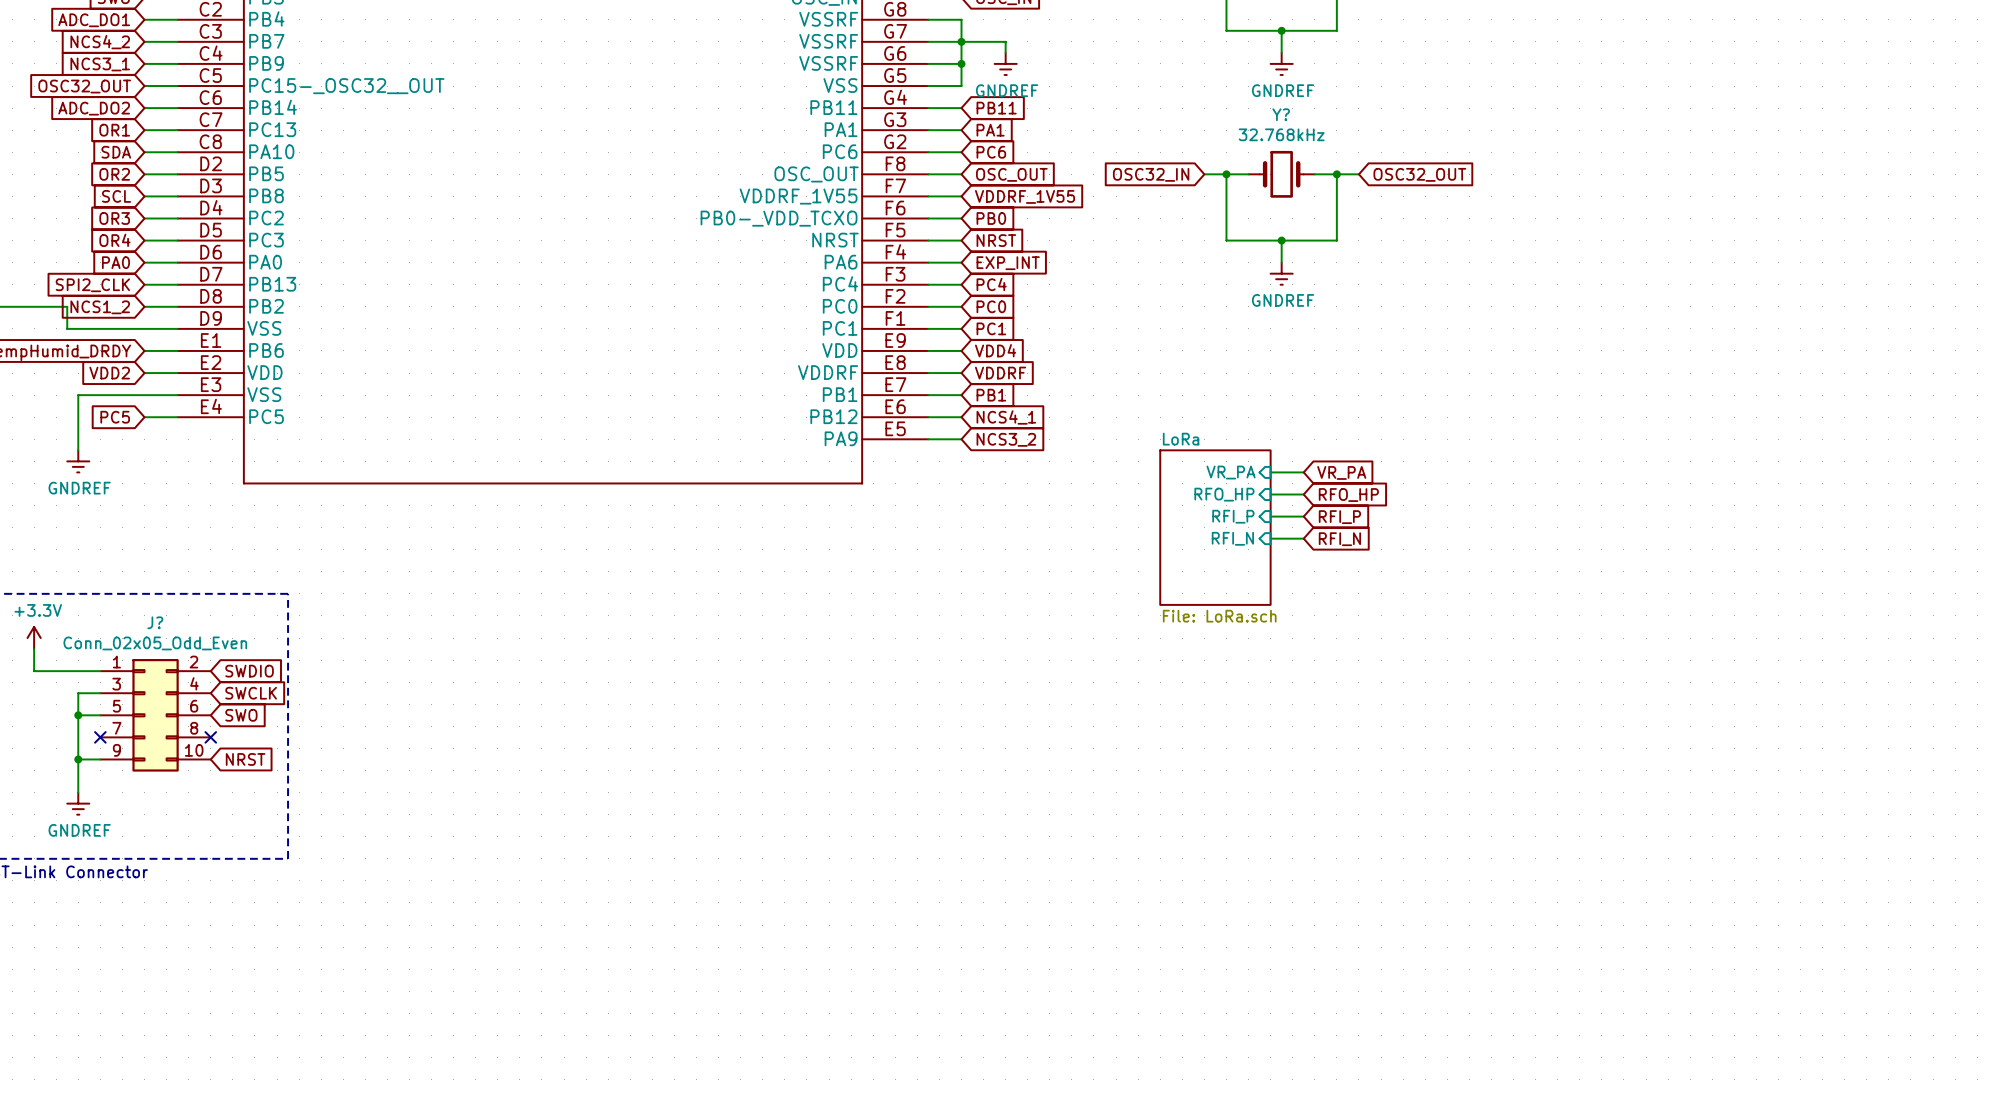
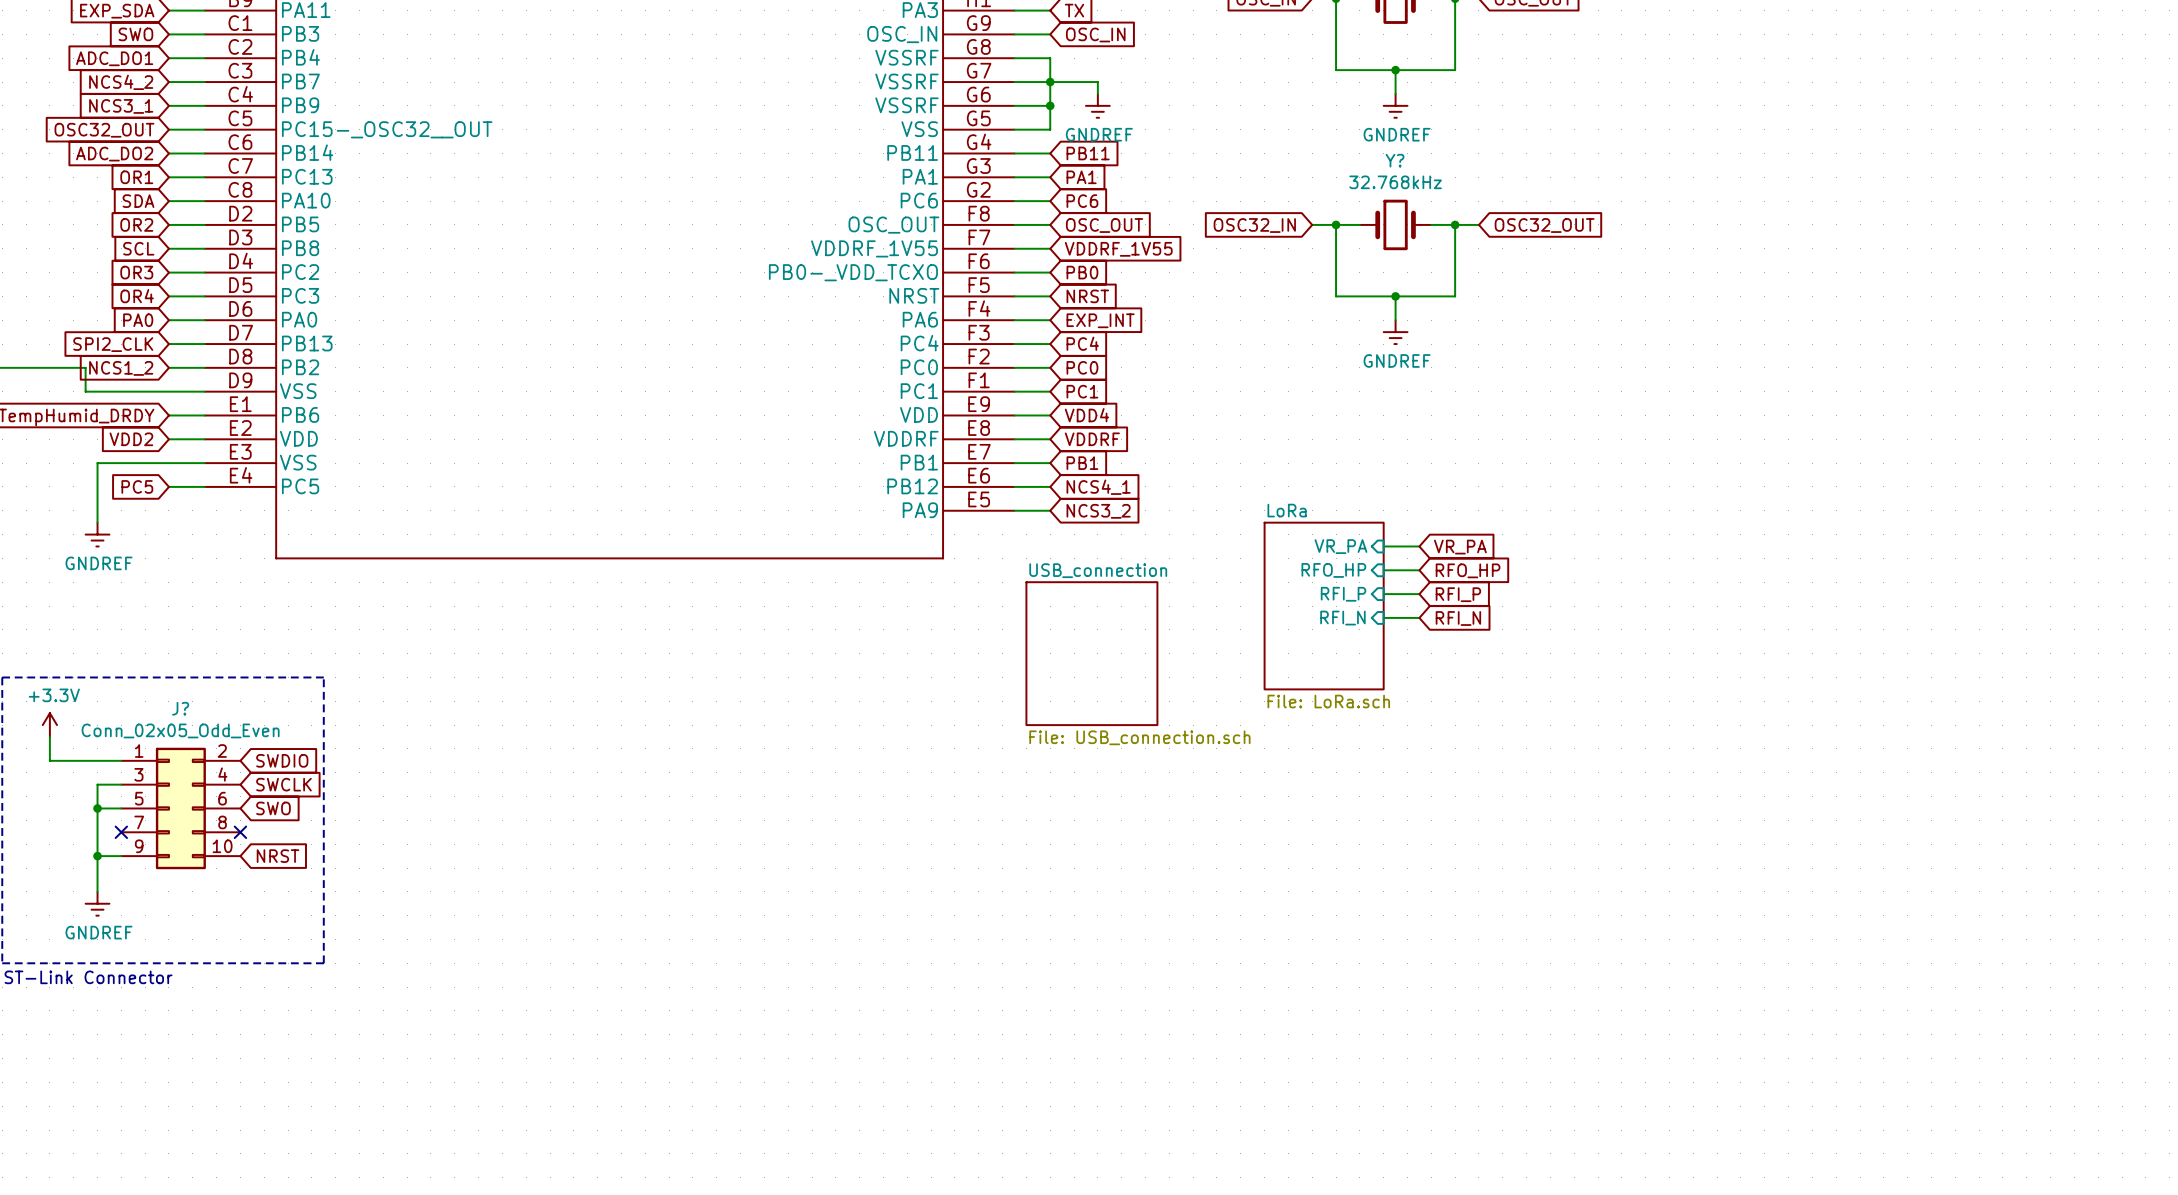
sheet USB_connection: none -> File: USB_connection.sch (1091, 653)

